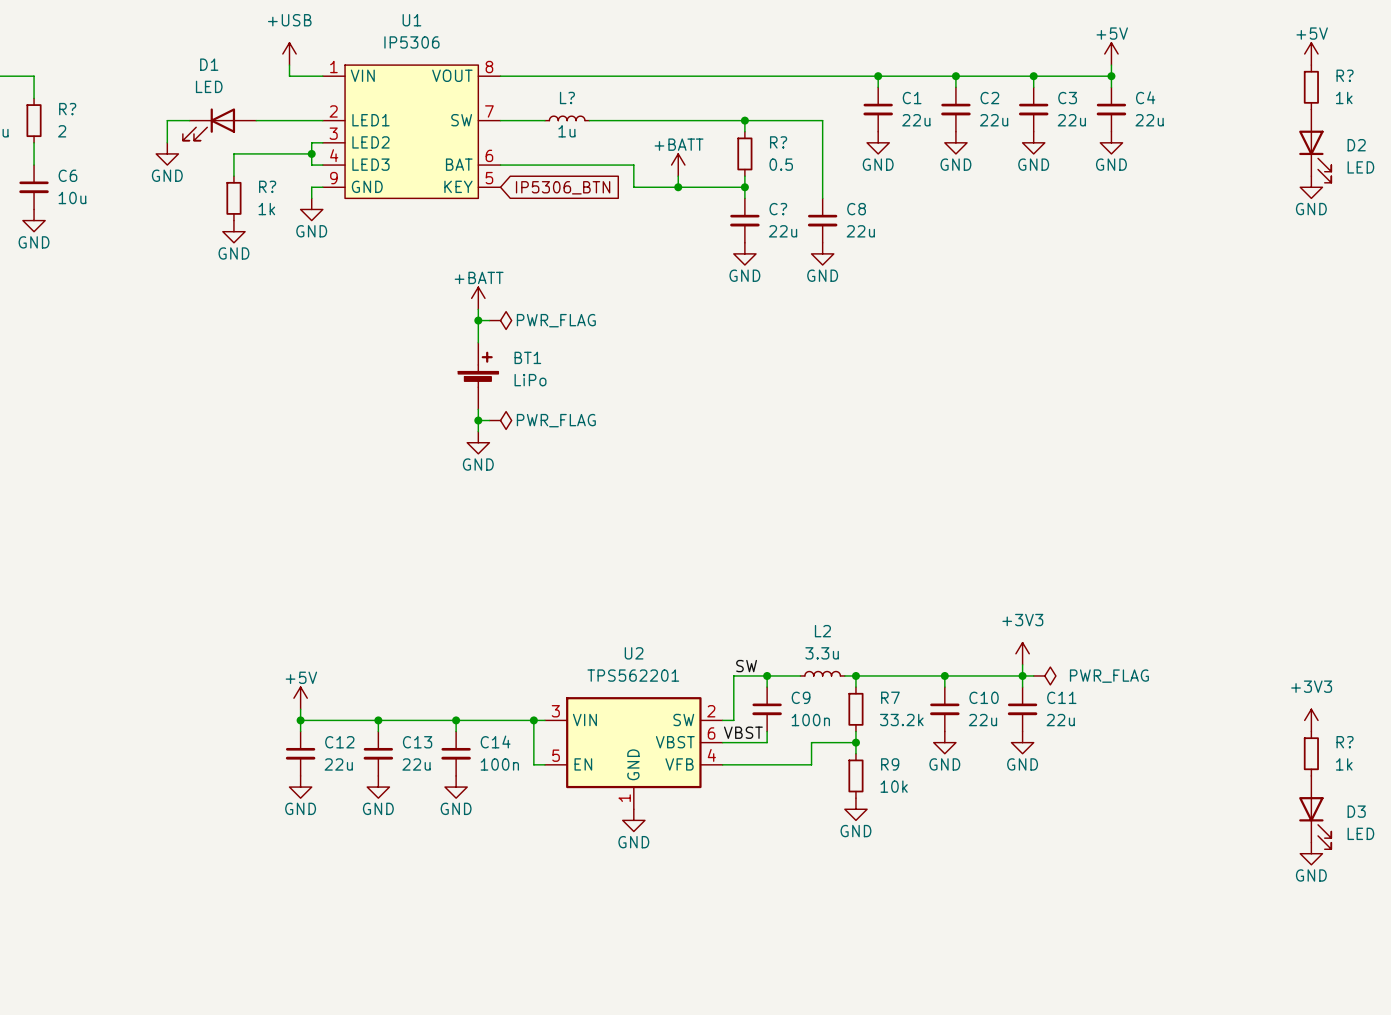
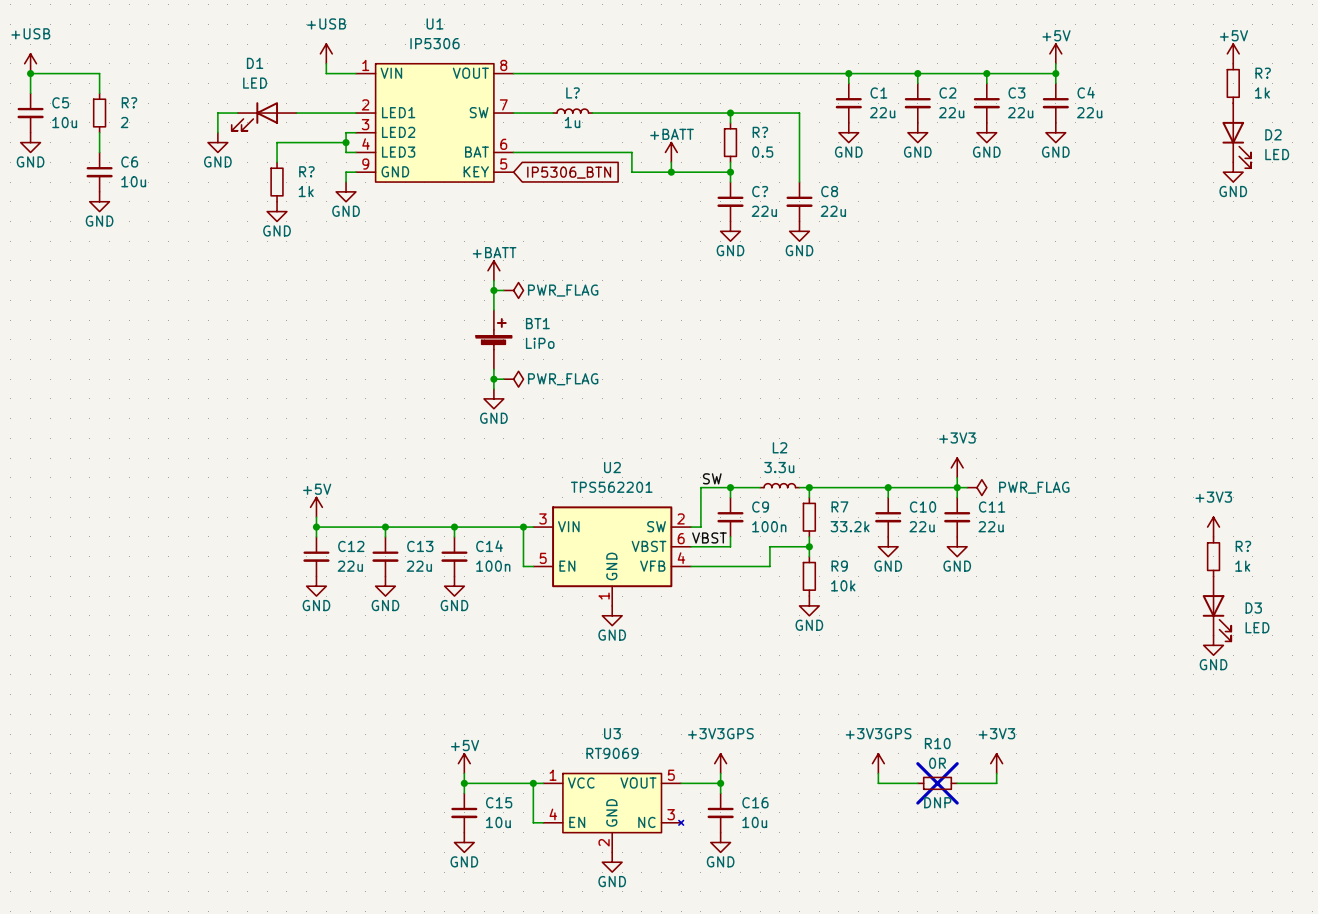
power symbol: none -> +3V3 (957, 467)
junction: none -> (730, 487)
junction: none -> (809, 487)
junction: none -> (888, 487)
junction: none -> (957, 487)
power symbol: none -> +5V (316, 507)
junction: none -> (316, 527)
junction: none -> (385, 527)
junction: none -> (454, 527)
junction: none -> (523, 527)
junction: none -> (809, 546)
power symbol: none -> GND (888, 546)
power symbol: none -> GND (957, 546)
power symbol: none -> GND (316, 586)
power symbol: none -> GND (385, 586)
power symbol: none -> GND (454, 586)
power symbol: +3V3 (1022, 653) -> none
wire: (1022, 664) (1022, 687) -> (957, 477) (957, 497)
label position: SW (746, 666) -> SW (712, 478)
L2 position: (822, 673) -> (779, 485)
wire: (767, 675) (767, 687) -> (730, 487) (730, 497)
junction: (767, 675) -> none
wire: (800, 675) (733, 675) (733, 720) (722, 720) -> (760, 487) (700, 487) (700, 527) (691, 527)
power symbol: none -> GND (809, 605)
wire: (844, 675) (1033, 675) -> (799, 487) (967, 487)
wire: (855, 675) (855, 687) -> (809, 487) (809, 497)
junction: (855, 675) -> none
wire: (944, 675) (944, 687) -> (888, 487) (888, 497)
junction: (944, 675) -> none
junction: (1022, 675) -> none
power symbol position: PWR_FLAG (1044, 675) -> PWR_FLAG (976, 487)
power symbol: none -> GND (612, 615)
power symbol: +5V (300, 698) -> none
wire: (300, 709) (300, 731) -> (316, 517) (316, 536)
C9 position: (767, 709) -> (730, 517)
R7 position: (855, 709) -> (809, 517)
C10 position: (944, 709) -> (888, 517)
C11 position: (1022, 709) -> (957, 517)
wire: (300, 720) (544, 720) -> (316, 527) (533, 527)
junction: (300, 720) -> none
wire: (378, 720) (378, 731) -> (385, 527) (385, 536)
junction: (378, 720) -> none
wire: (456, 720) (456, 731) -> (454, 527) (454, 536)
junction: (456, 720) -> none
wire: (533, 720) (533, 764) (544, 764) -> (523, 527) (523, 566) (533, 566)
junction: (533, 720) -> none
power symbol: none -> GND (1213, 645)
power symbol position: +3V3 (1311, 720) -> +3V3 (1213, 527)
wire: (767, 731) (767, 742) (722, 742) -> (730, 536) (730, 546) (691, 546)
wire: (855, 731) (855, 753) -> (809, 536) (809, 556)
label position: VBST (743, 732) -> VBST (709, 537)
wire: (855, 742) (811, 742) (811, 764) (722, 764) -> (809, 546) (769, 546) (769, 566) (691, 566)
junction: (855, 742) -> none
power symbol: GND (944, 742) -> none
power symbol: GND (1022, 742) -> none
C12 position: (300, 753) -> (316, 556)
C13 position: (378, 753) -> (385, 556)
C14 position: (456, 753) -> (454, 556)
U2 position: (633, 753) -> (612, 556)
R? position: (1311, 753) -> (1213, 556)
R9 position: (855, 775) -> (809, 576)
power symbol: GND (300, 787) -> none
power symbol: GND (378, 787) -> none
power symbol: GND (456, 787) -> none
power symbol: GND (855, 809) -> none
D3 position: (1315, 812) -> (1216, 608)
power symbol: GND (633, 820) -> none
power symbol: none -> +5V (464, 763)
power symbol: none -> +3V3GPS (720, 763)
power symbol: none -> +3V3GPS (878, 763)
line: none -> (917, 763) (957, 803)
line: none -> (957, 763) (917, 803)
power symbol: none -> +3V3 (996, 763)
power symbol: GND (1311, 853) -> none
wire: none -> (464, 773) (464, 793)
wire: none -> (720, 773) (720, 793)
wire: none -> (878, 773) (878, 783) (917, 783)
wire: none -> (996, 773) (996, 783) (957, 783)
wire: none -> (464, 783) (543, 783)
junction: none -> (464, 783)
wire: none -> (533, 783) (533, 822) (543, 822)
junction: none -> (533, 783)
wire: none -> (681, 783) (720, 783)
junction: none -> (720, 783)
R10: none -> 0R (937, 783)
C15: none -> 10u (464, 812)
U3: none -> RT9069 (613, 812)
C16: none -> 10u (720, 812)
power symbol: none -> GND (464, 842)
power symbol: none -> GND (720, 842)
power symbol: none -> GND (612, 862)

